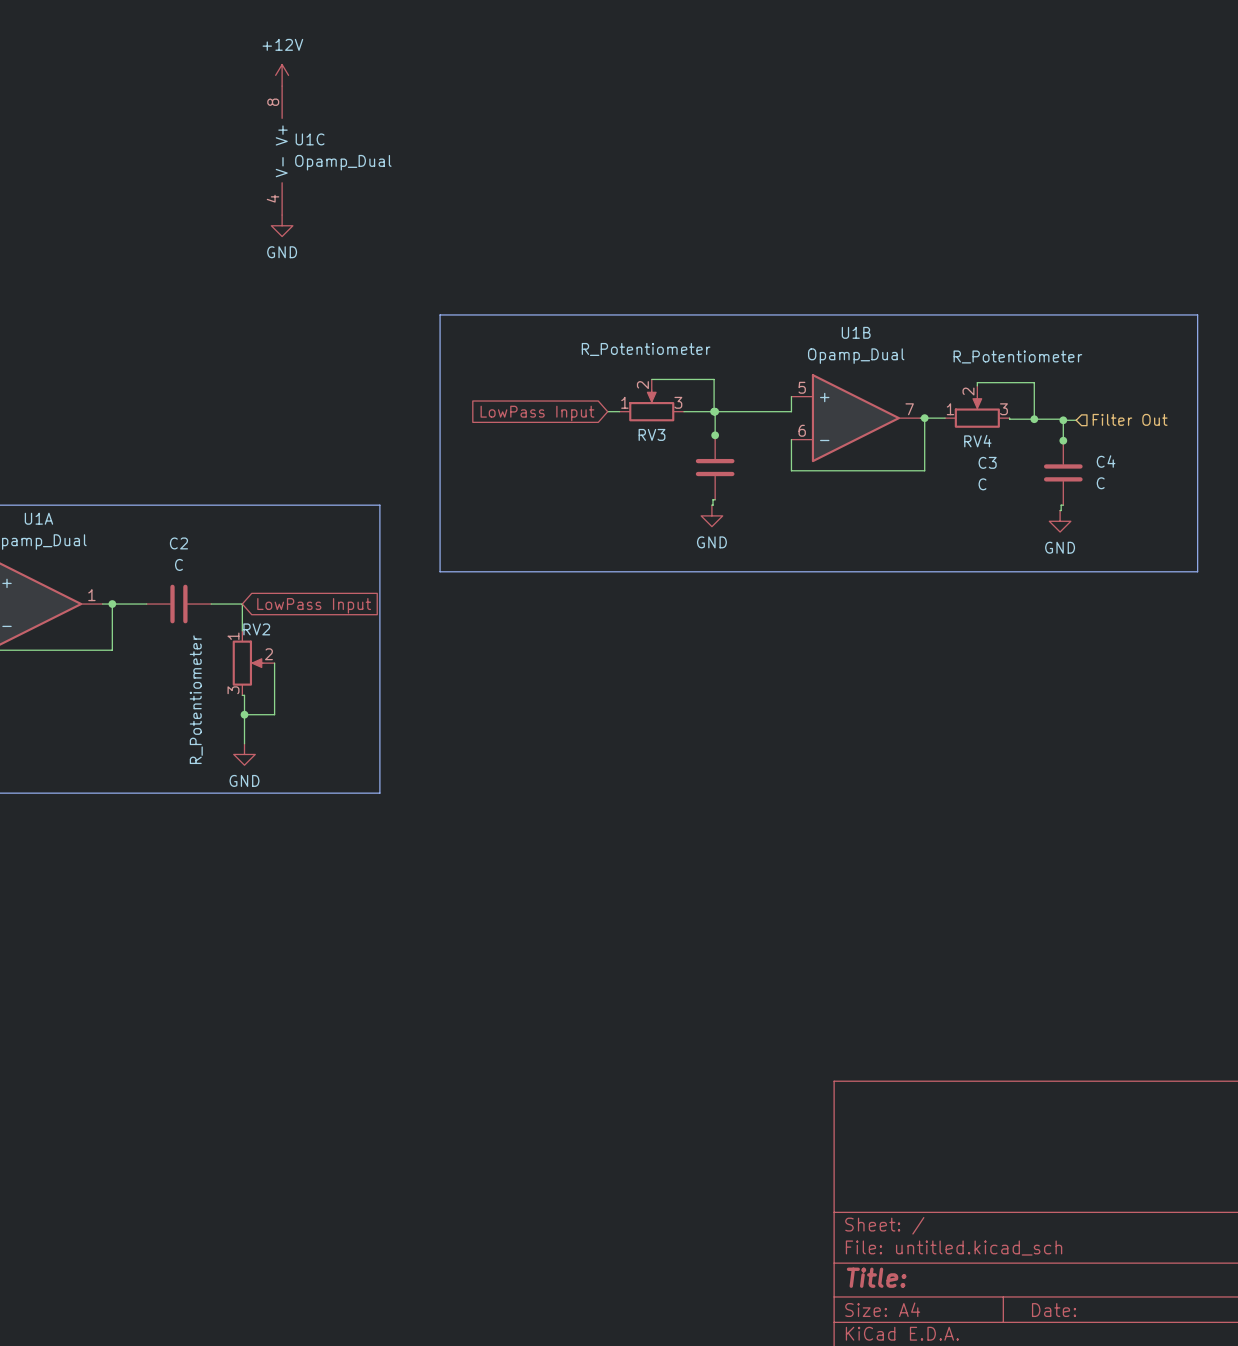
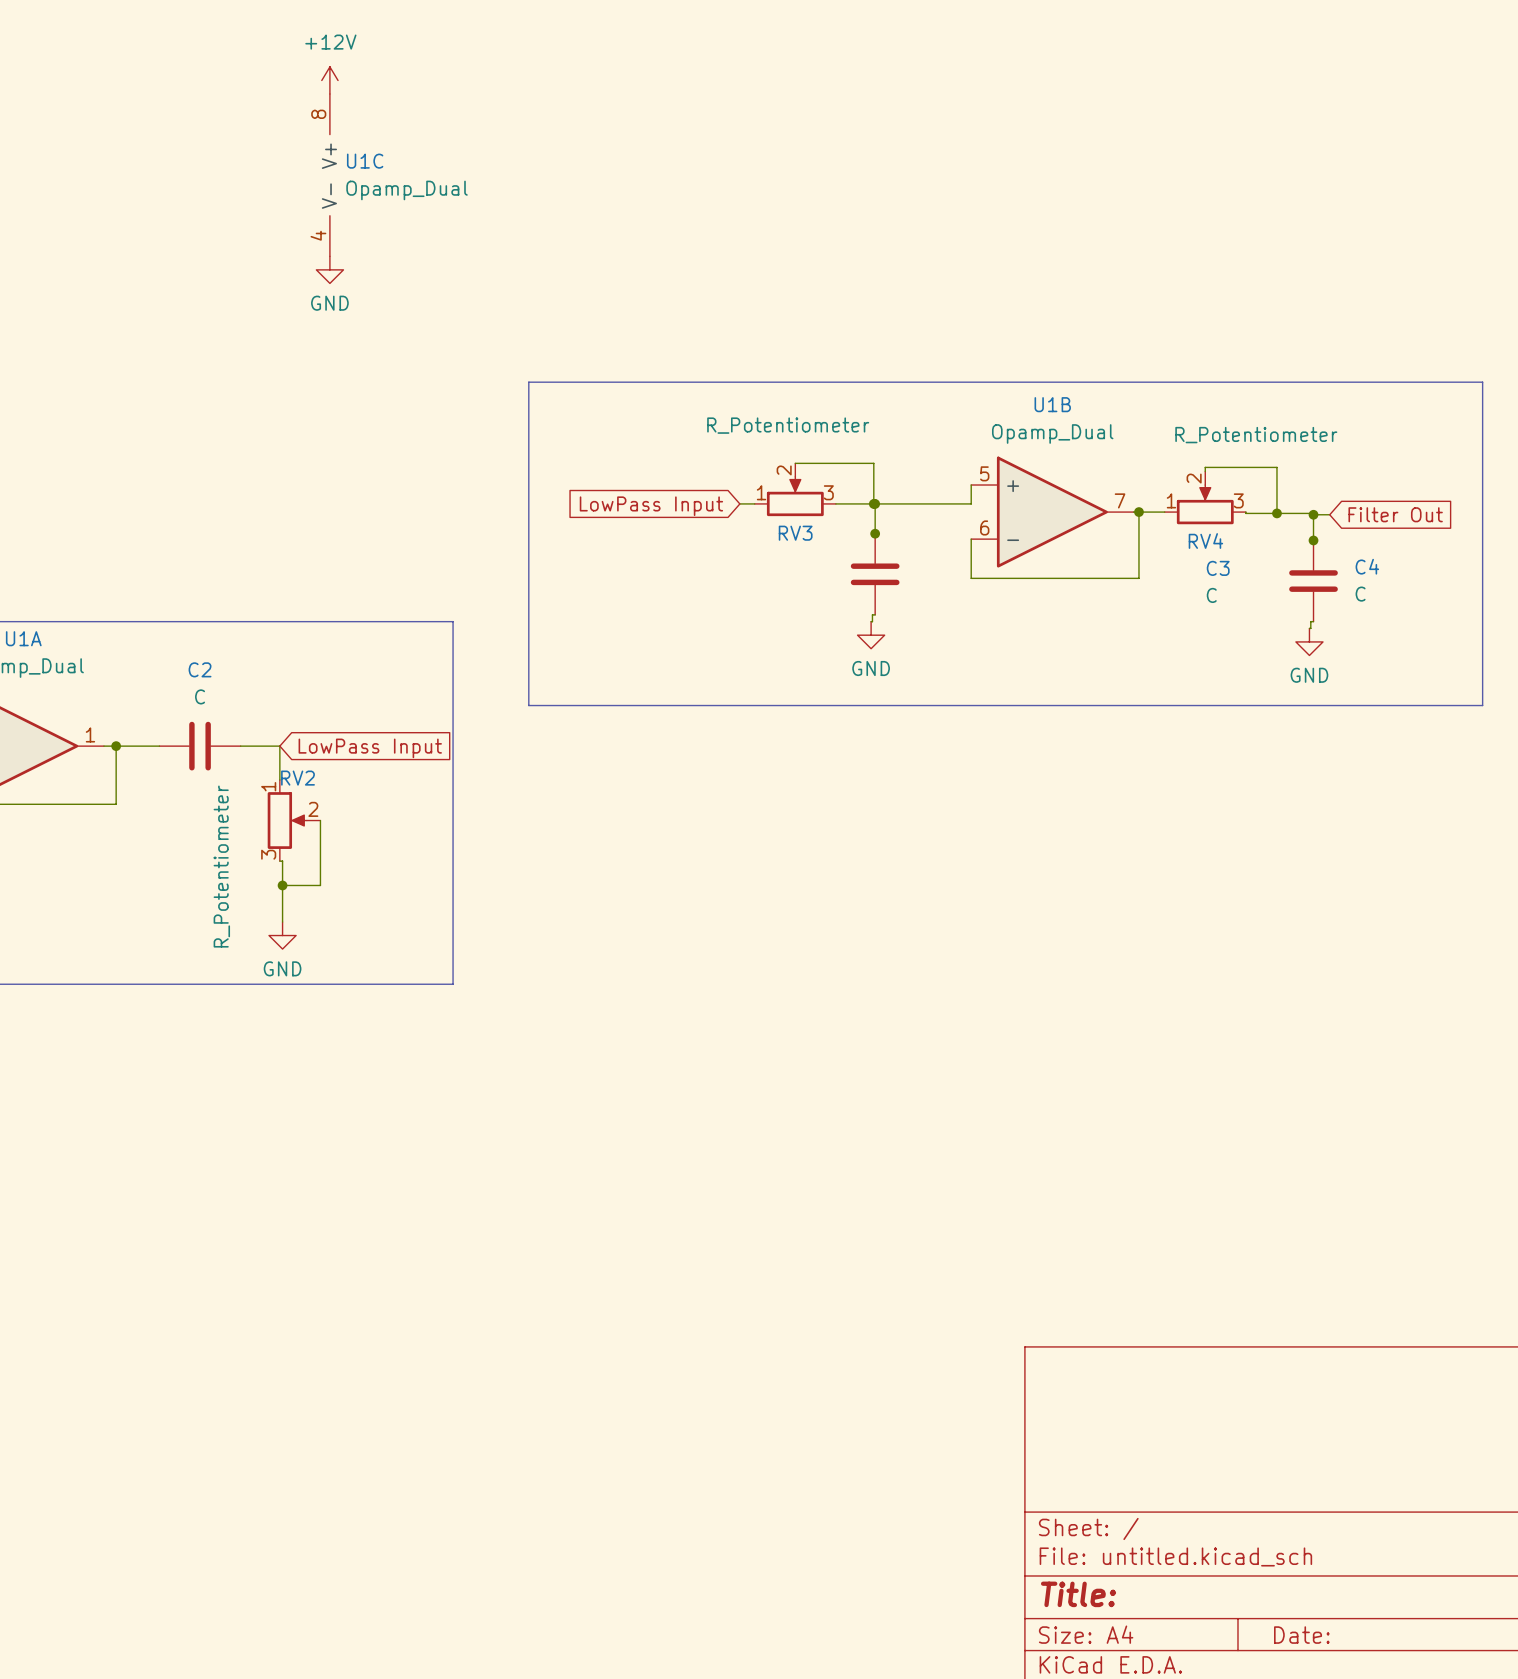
hierarchical label: Filter Out (1130, 419) -> none
global label: none -> Filter Out (1395, 514)

